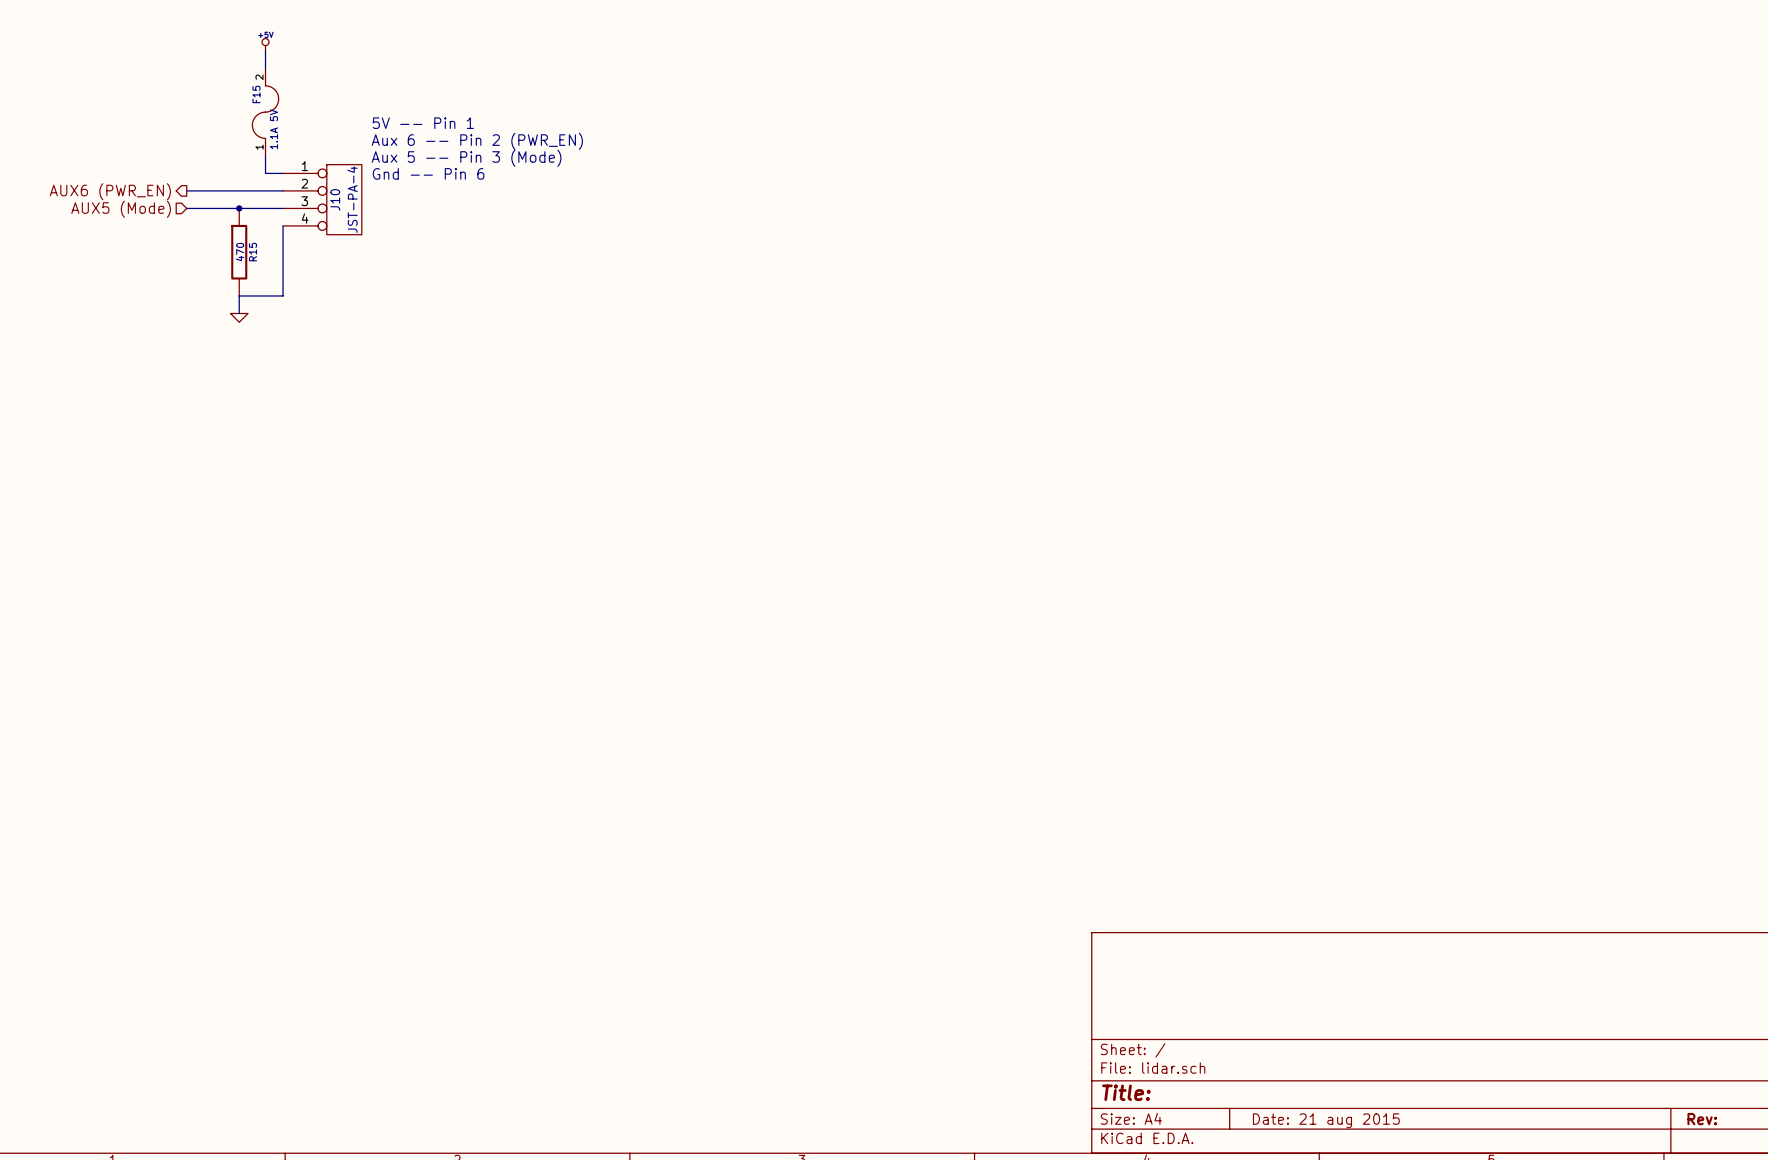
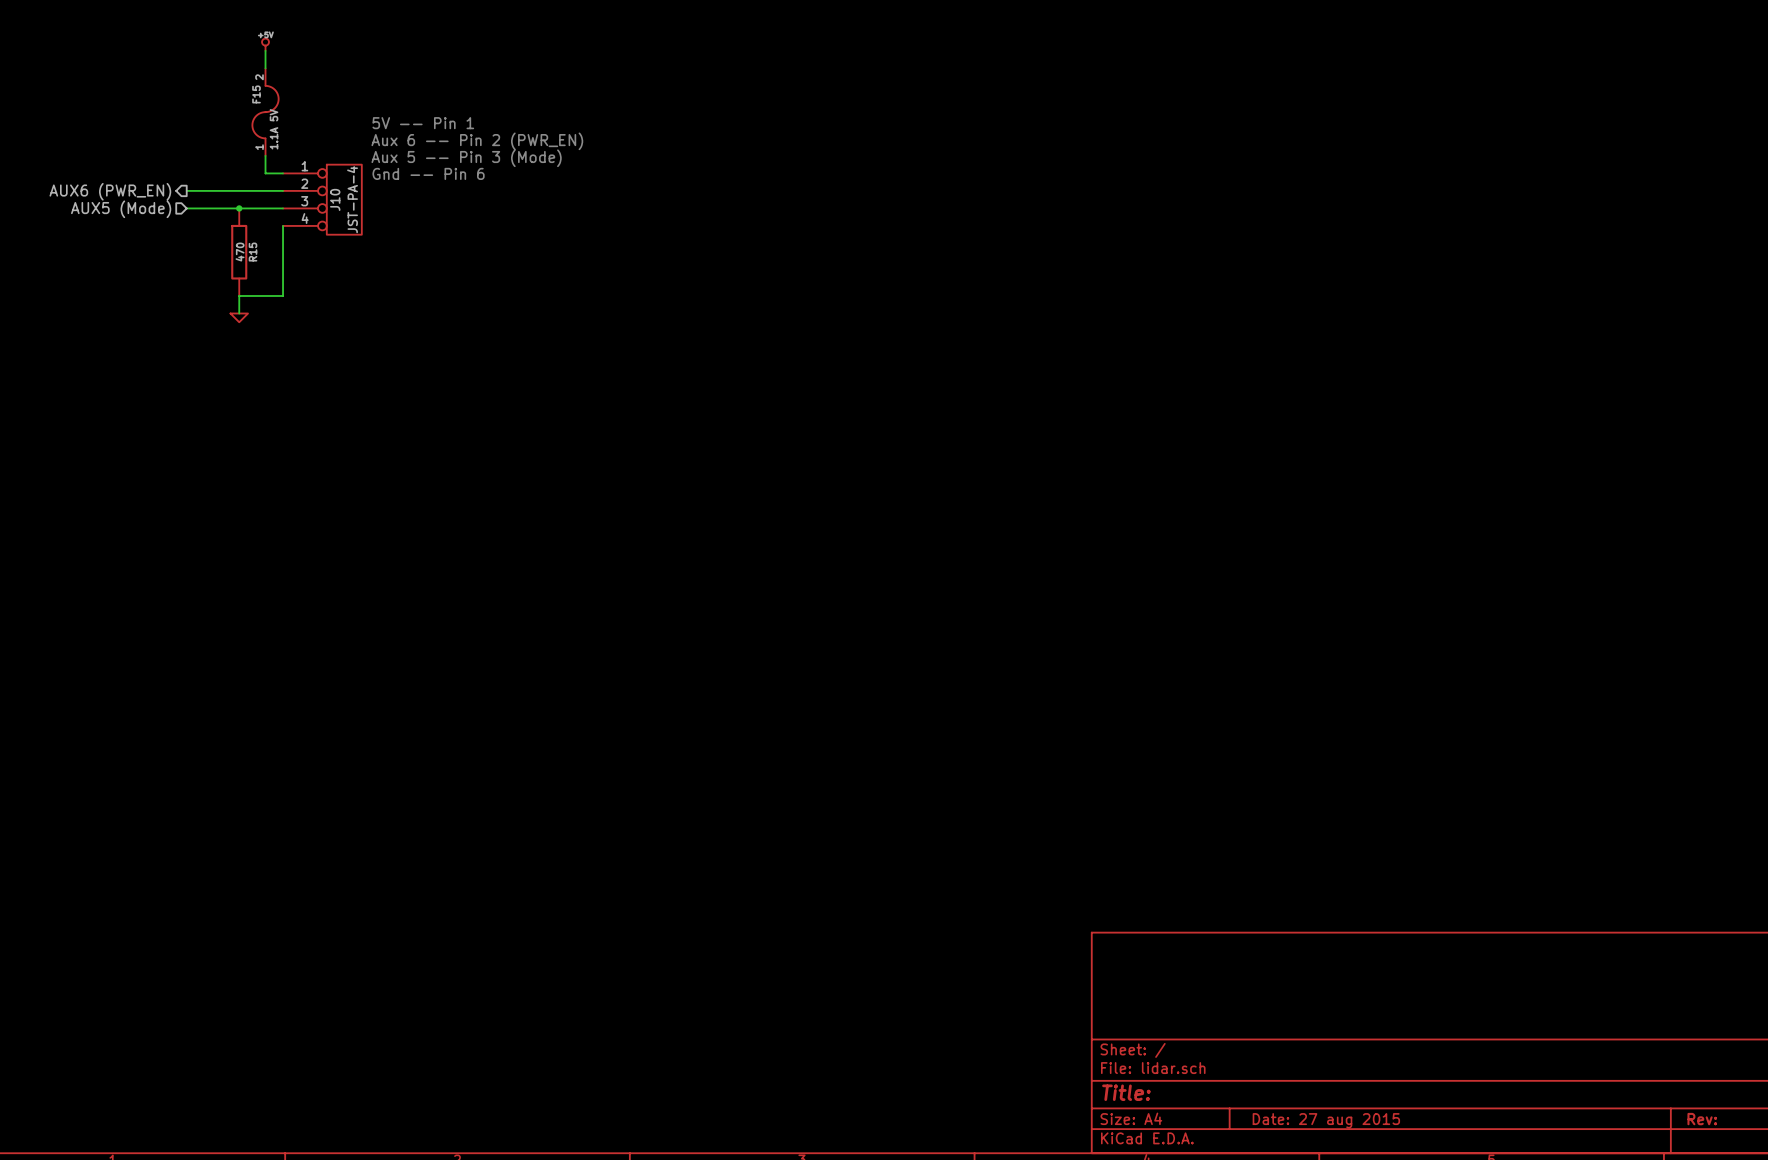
title block: Date: 21 aug 2015 (1326, 1120) -> Date: 27 aug 2015 (1326, 1120)

